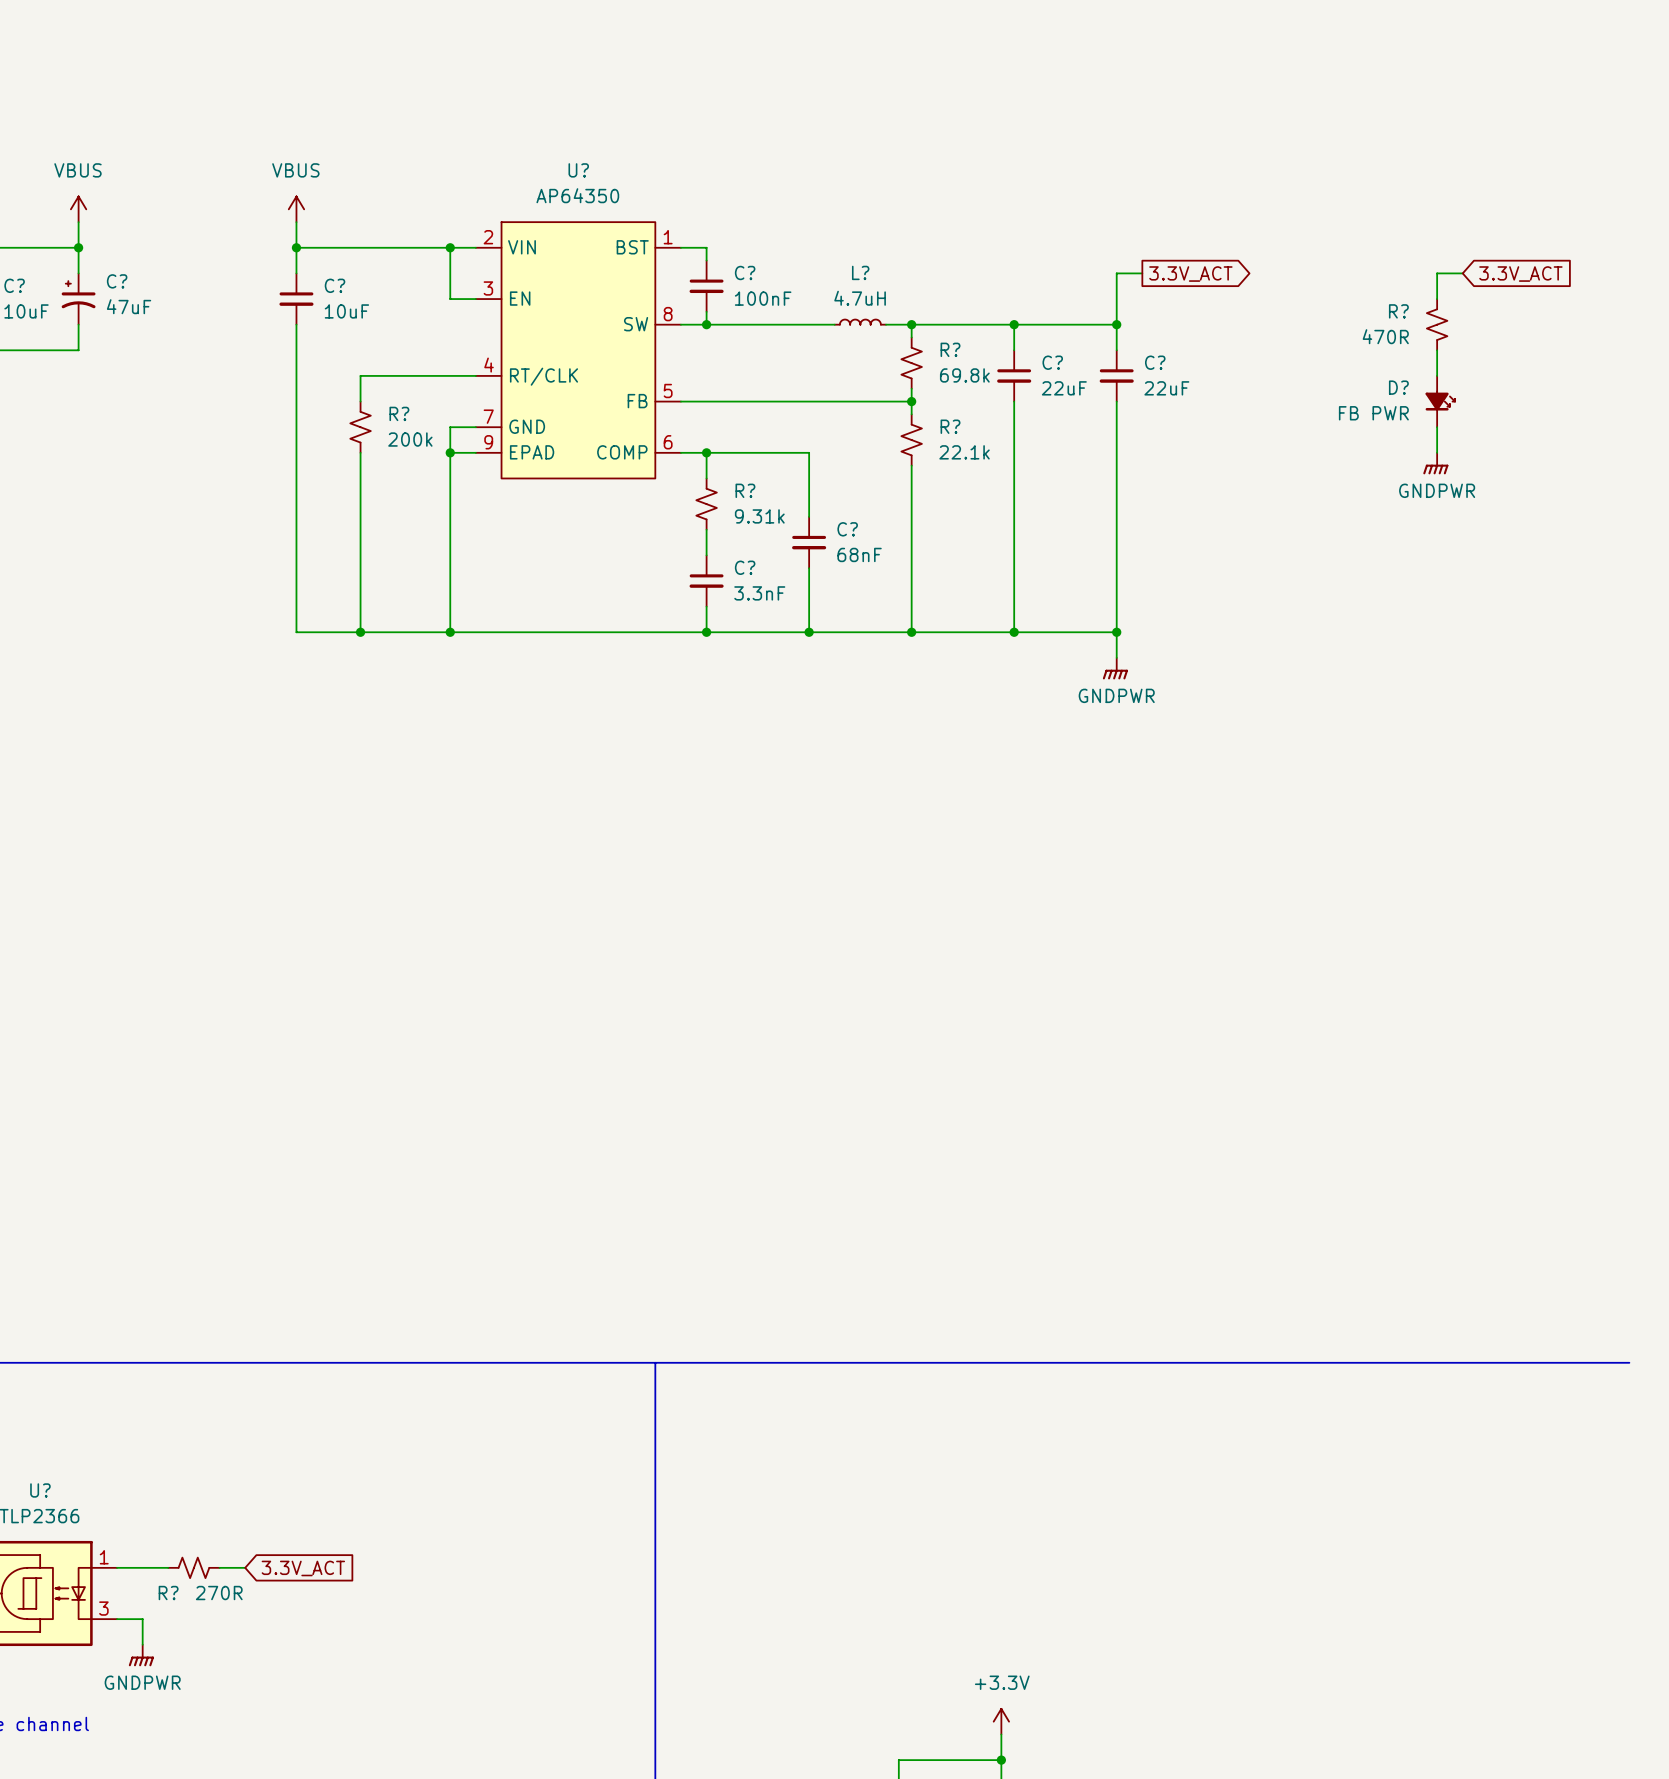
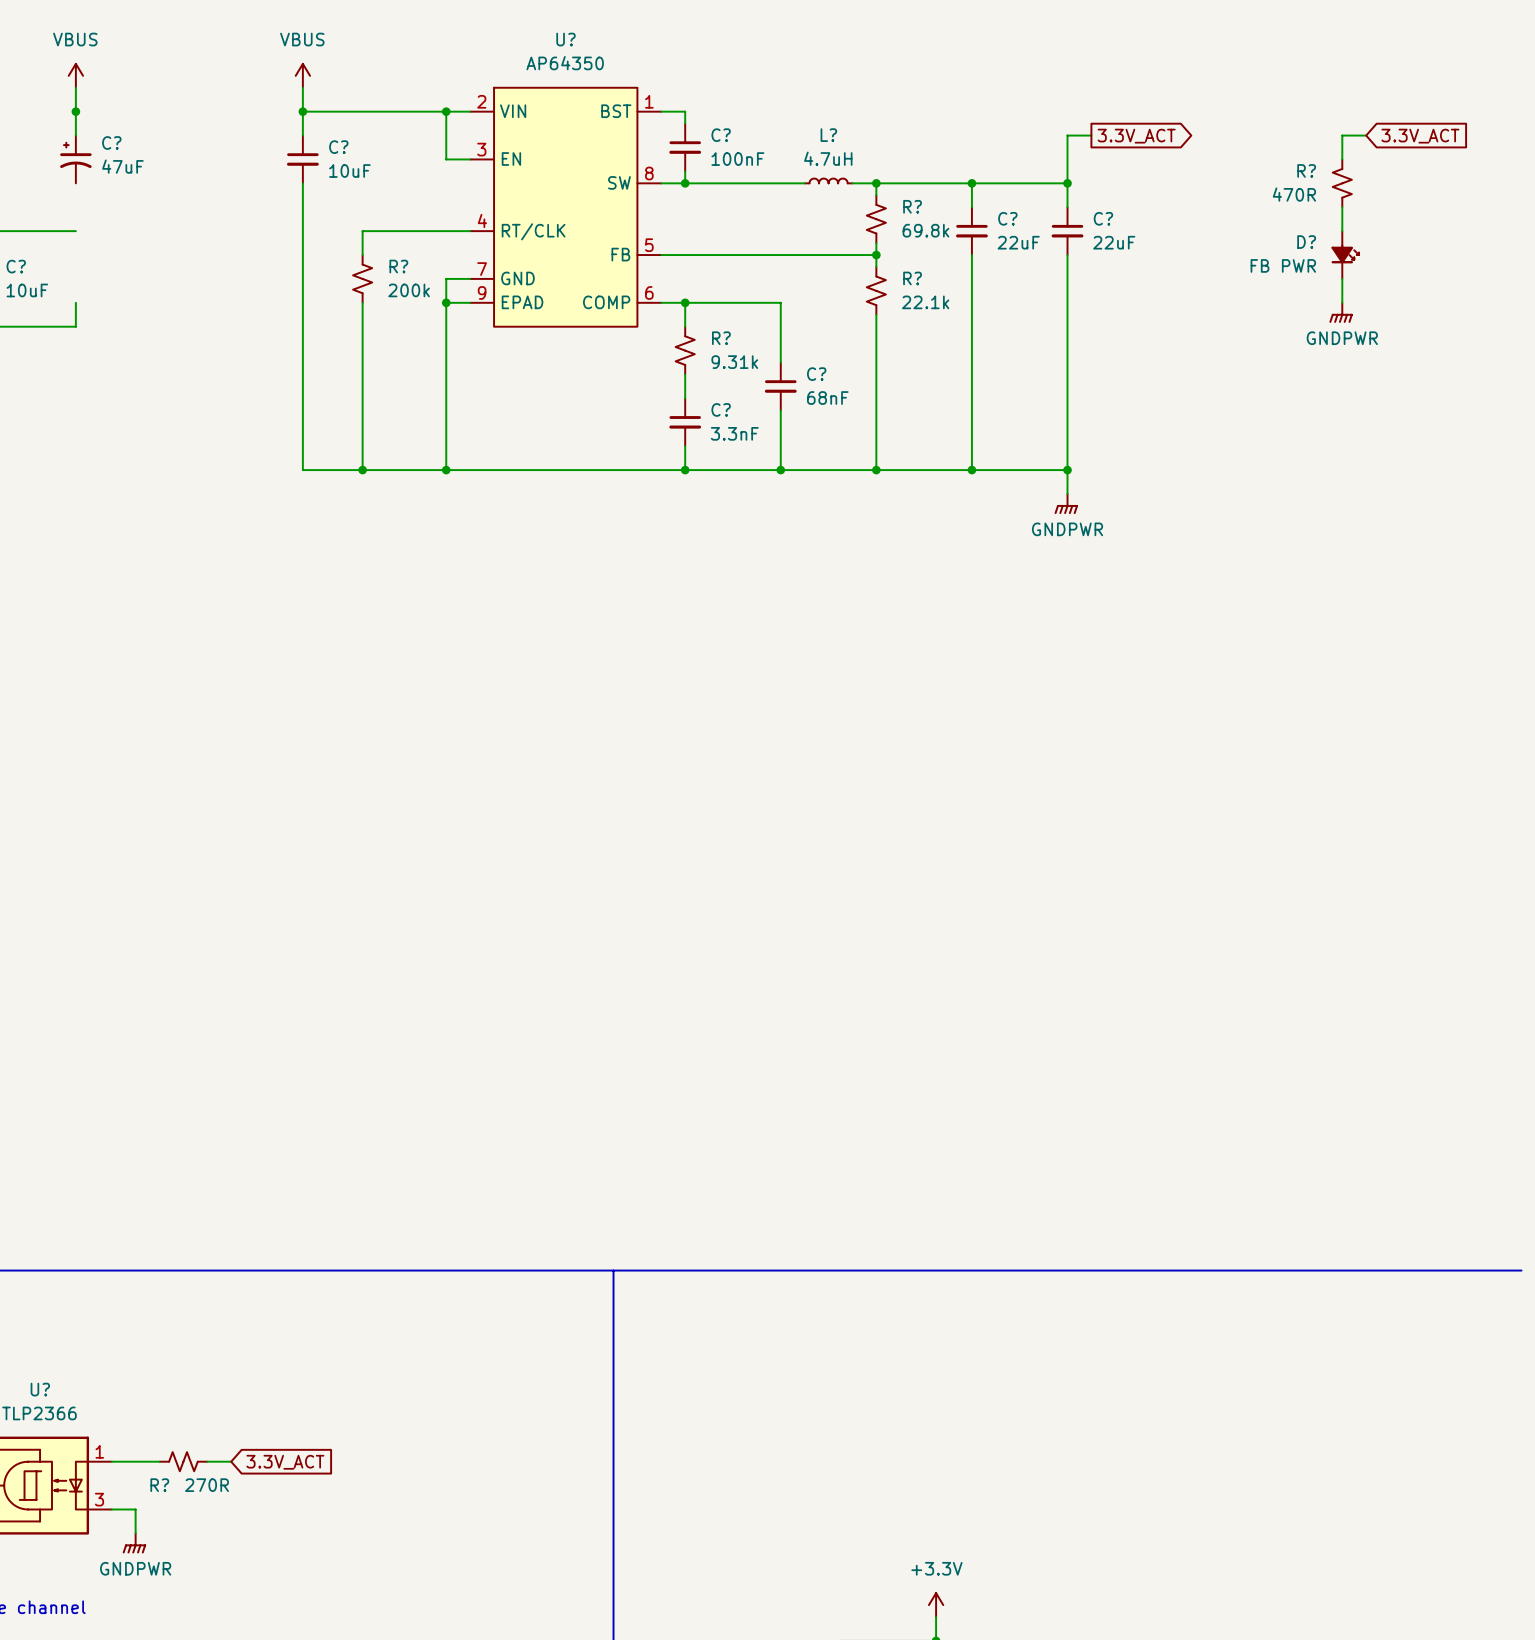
power symbol: none -> VBUS (75, 75)
power symbol: none -> VBUS (302, 75)
junction: none -> (75, 111)
wire: none -> (302, 111) (470, 111)
junction: none -> (302, 111)
junction: none -> (446, 111)
wire: none -> (1091, 135) (1067, 135) (1067, 207)
wire: none -> (1366, 135) (1342, 135) (1342, 159)
wire: none -> (685, 171) (685, 183)
wire: none -> (661, 183) (804, 183)
junction: none -> (685, 183)
junction: none -> (876, 183)
junction: none -> (971, 183)
junction: none -> (1067, 183)
power symbol: VBUS (78, 209) -> none
power symbol: VBUS (296, 209) -> none
wire: (78, 222) (78, 273) -> (75, 87) (75, 135)
wire: (296, 222) (296, 273) -> (302, 87) (302, 135)
junction: (78, 247) -> none
wire: (296, 247) (386, 247) -> (362, 255) (362, 231)
junction: (296, 247) -> none
wire: (450, 247) (450, 299) (475, 299) -> (446, 111) (446, 159) (470, 159)
junction: (450, 247) -> none
wire: (680, 247) (706, 247) (706, 260) -> (661, 111) (685, 111) (685, 123)
C?: none -> 22uF (971, 231)
C?: none -> 22uF (1067, 231)
junction: none -> (876, 255)
wire: (1142, 273) (1116, 273) (1116, 350) -> (1067, 255) (1067, 493)
global label position: 3.3V_ACT (1190, 274) -> 3.3V_ACT (1136, 136)
global label position: 3.3V_ACT (1520, 274) -> 3.3V_ACT (1420, 136)
C? position: (706, 286) -> (685, 147)
C? position: (78, 299) -> (75, 159)
C? position: (296, 299) -> (302, 159)
L? position: (860, 322) -> (828, 180)
wire: (296, 324) (296, 632) (1116, 632) -> (302, 183) (302, 470) (1067, 470)
junction: none -> (446, 302)
junction position: (706, 324) -> (685, 302)
wire: none -> (780, 302) (780, 362)
wire: (886, 324) (1116, 324) -> (852, 183) (1067, 183)
wire: (911, 324) (911, 337) -> (876, 183) (876, 195)
junction: (911, 324) -> none
wire: (1014, 324) (1014, 350) -> (971, 183) (971, 207)
junction: (1014, 324) -> none
junction: (1116, 324) -> none
R? position: (1437, 324) -> (1342, 183)
U? position: (578, 350) -> (565, 207)
wire: (1437, 350) (1437, 375) -> (1342, 207) (1342, 231)
R? position: (911, 363) -> (876, 219)
wire: (475, 375) (360, 375) (360, 401) -> none
C?: 22uF (1014, 375) -> none
C?: 22uF (1116, 375) -> none
wire: (911, 388) (911, 414) -> (876, 243) (876, 266)
wire: (680, 401) (911, 401) -> (661, 255) (876, 255)
junction: (911, 401) -> none
wire: (1014, 401) (1014, 632) -> (971, 255) (971, 470)
wire: (1116, 401) (1116, 657) -> none
D? position: (1440, 401) -> (1345, 255)
R? position: (360, 427) -> (362, 278)
wire: (475, 427) (450, 427) (450, 632) -> (470, 278) (446, 278) (446, 470)
wire: (1437, 427) (1437, 452) -> none
R? position: (911, 440) -> (876, 290)
wire: (360, 452) (360, 632) -> (362, 302) (362, 470)
wire: (450, 452) (475, 452) -> (446, 302) (470, 302)
junction: (450, 452) -> none
wire: (680, 452) (809, 452) (809, 516) -> none
wire: (706, 452) (706, 478) -> (685, 302) (685, 326)
junction position: (706, 452) -> (685, 470)
power symbol position: GNDPWR (1435, 463) -> GNDPWR (1341, 312)
wire: (911, 465) (911, 632) -> (876, 314) (876, 470)
junction: none -> (362, 470)
junction: none -> (446, 470)
R? position: (706, 504) -> (685, 350)
junction: none -> (780, 470)
junction: none -> (876, 470)
junction: none -> (971, 470)
junction: none -> (1067, 470)
wire: (706, 529) (706, 555) -> (685, 374) (685, 398)
C? position: (809, 542) -> (780, 386)
wire: (809, 568) (809, 632) -> (780, 410) (780, 470)
C? position: (706, 581) -> (685, 422)
wire: (706, 606) (706, 632) -> (685, 446) (685, 470)
junction: (360, 632) -> none
junction: (450, 632) -> none
junction: (706, 632) -> none
junction: (809, 632) -> none
junction: (911, 632) -> none
junction: (1014, 632) -> none
junction: (1116, 632) -> none
power symbol position: GNDPWR (1115, 668) -> GNDPWR (1066, 504)

